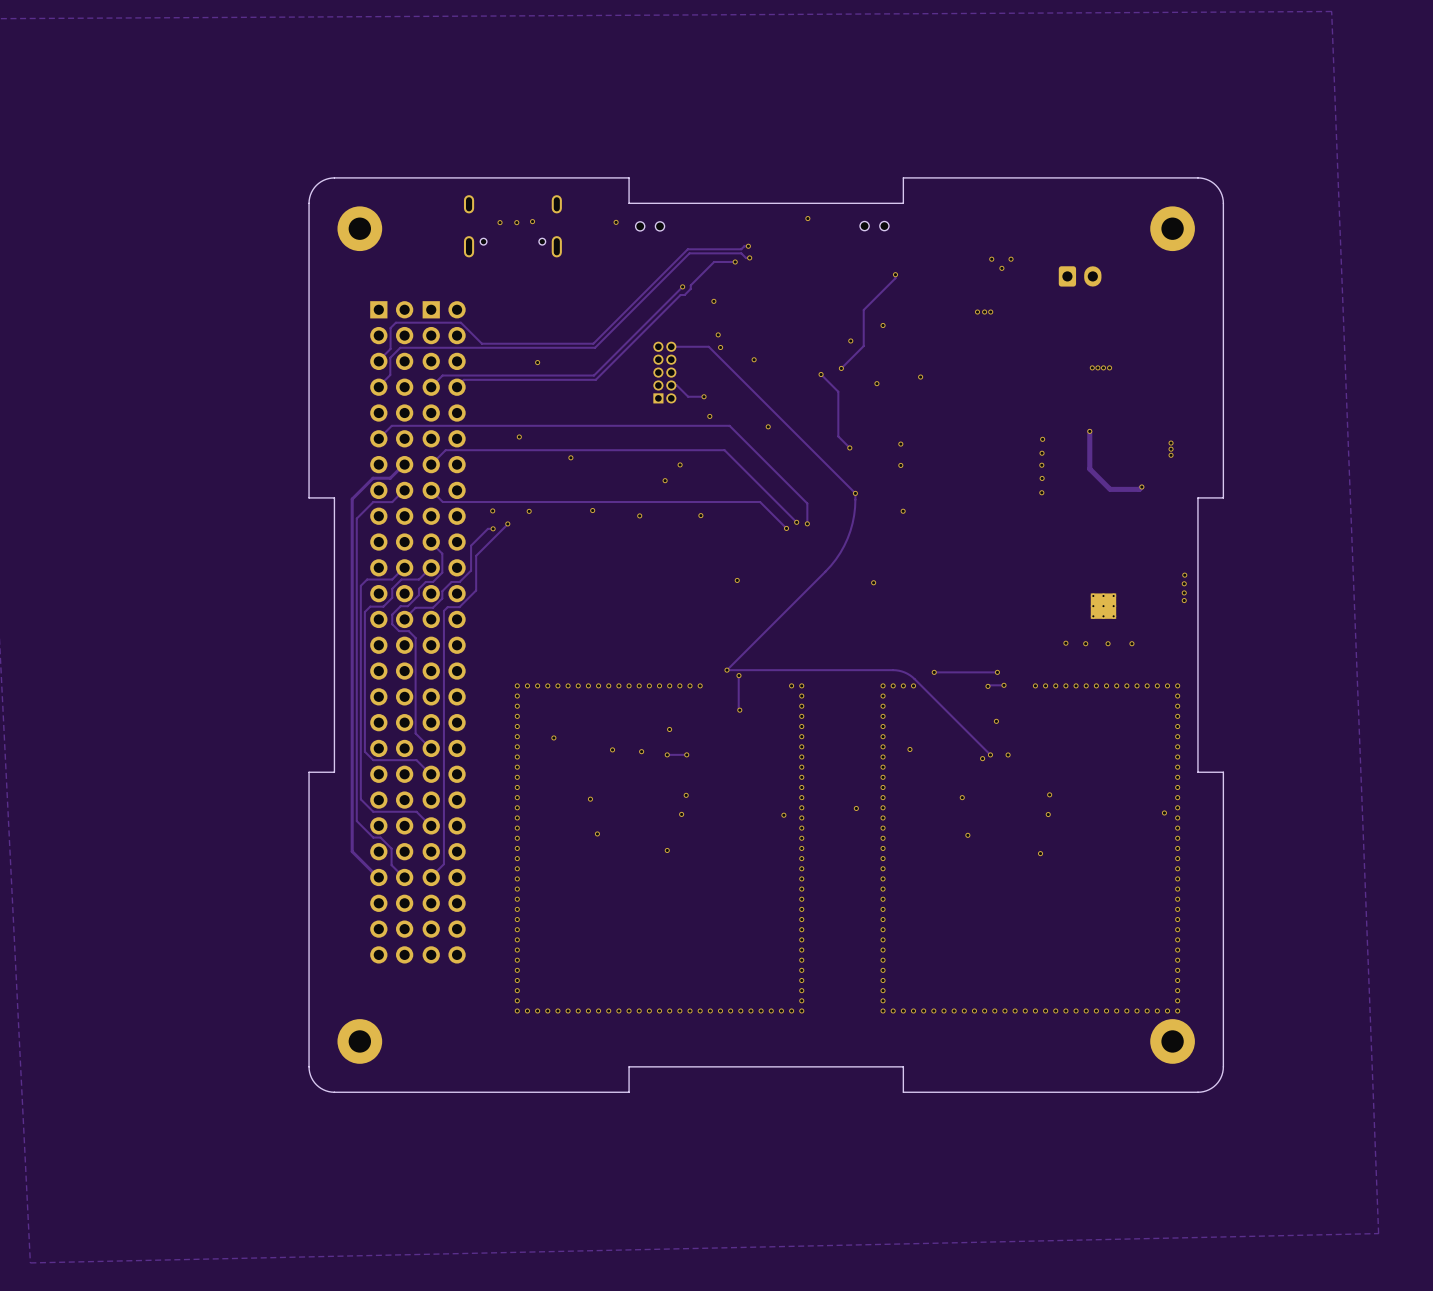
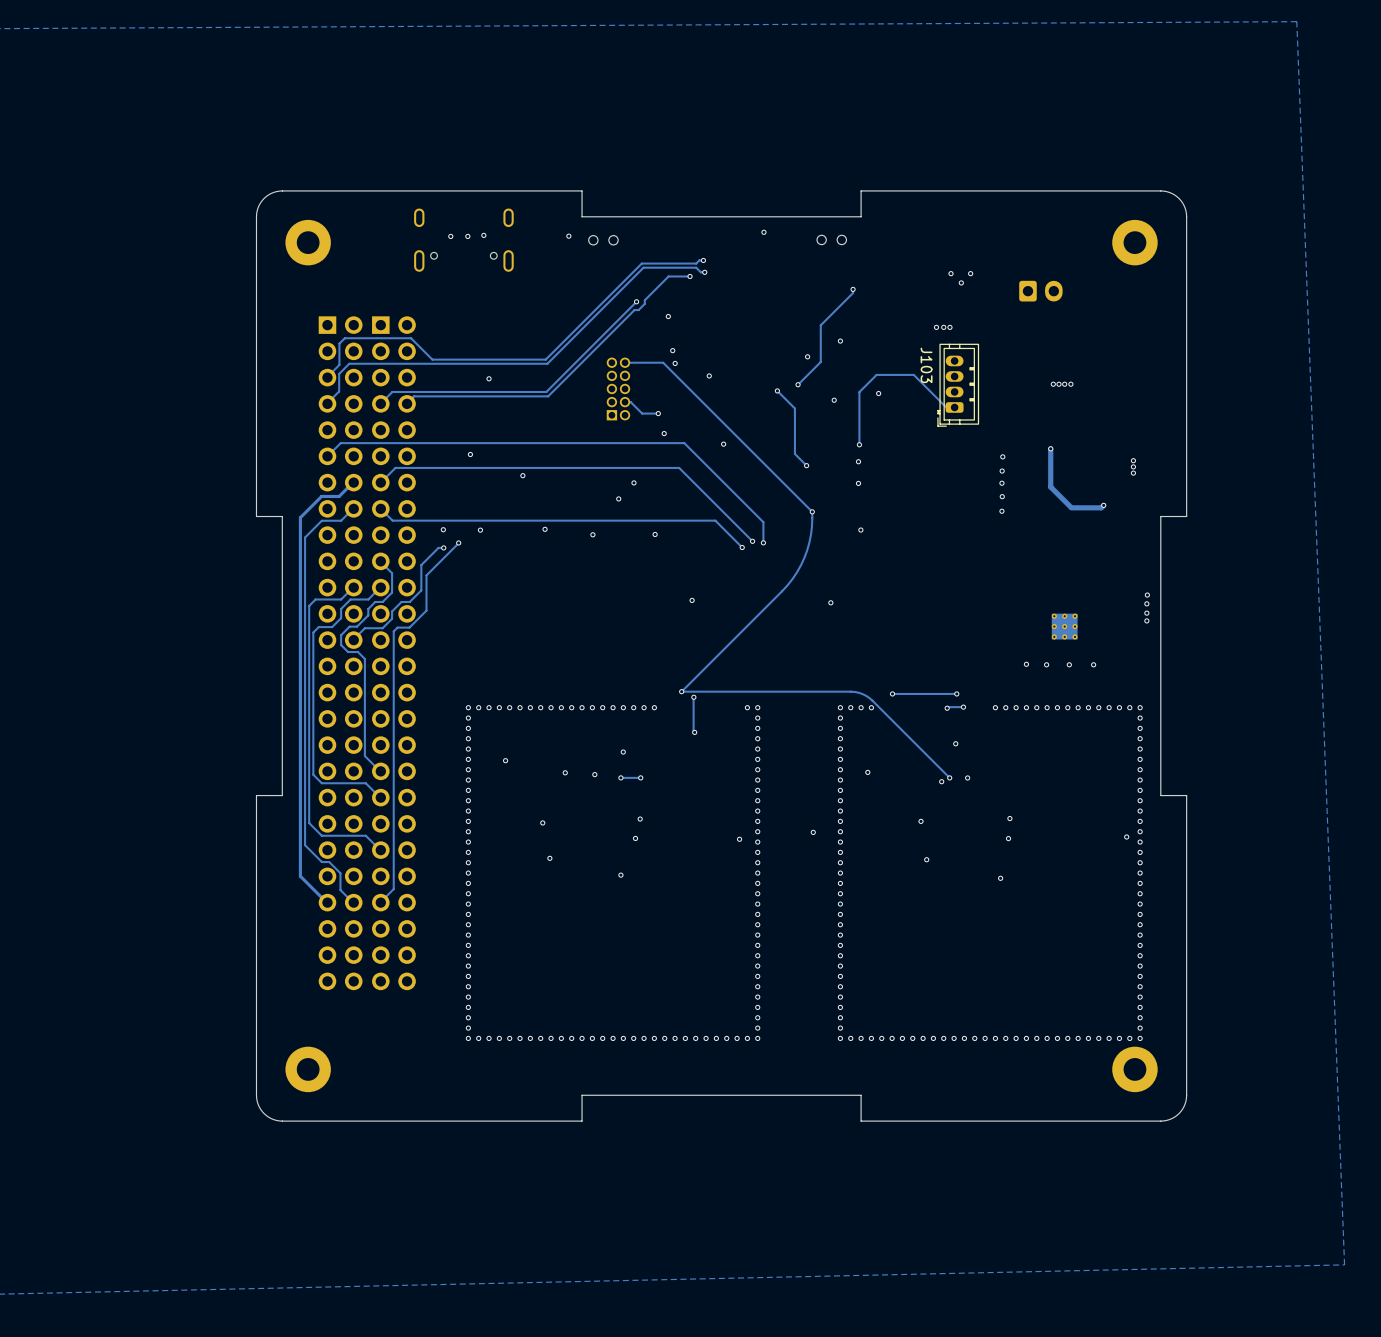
J103: none -> (958, 385)
track: none -> (954, 407) (946, 407) (913, 374) (876, 374) (859, 392) (859, 444)
via: none -> (859, 444)

